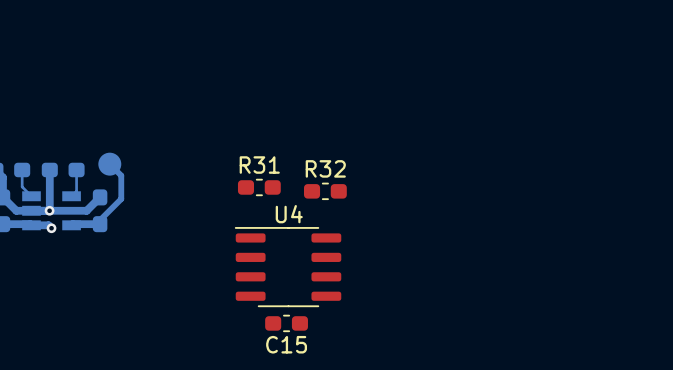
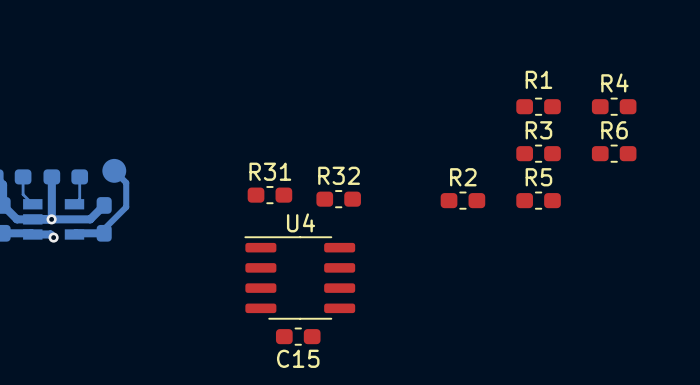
R1: none -> (538, 106)
R4: none -> (614, 106)
R3: none -> (538, 153)
R6: none -> (614, 153)
R2: none -> (462, 200)
R5: none -> (538, 200)

